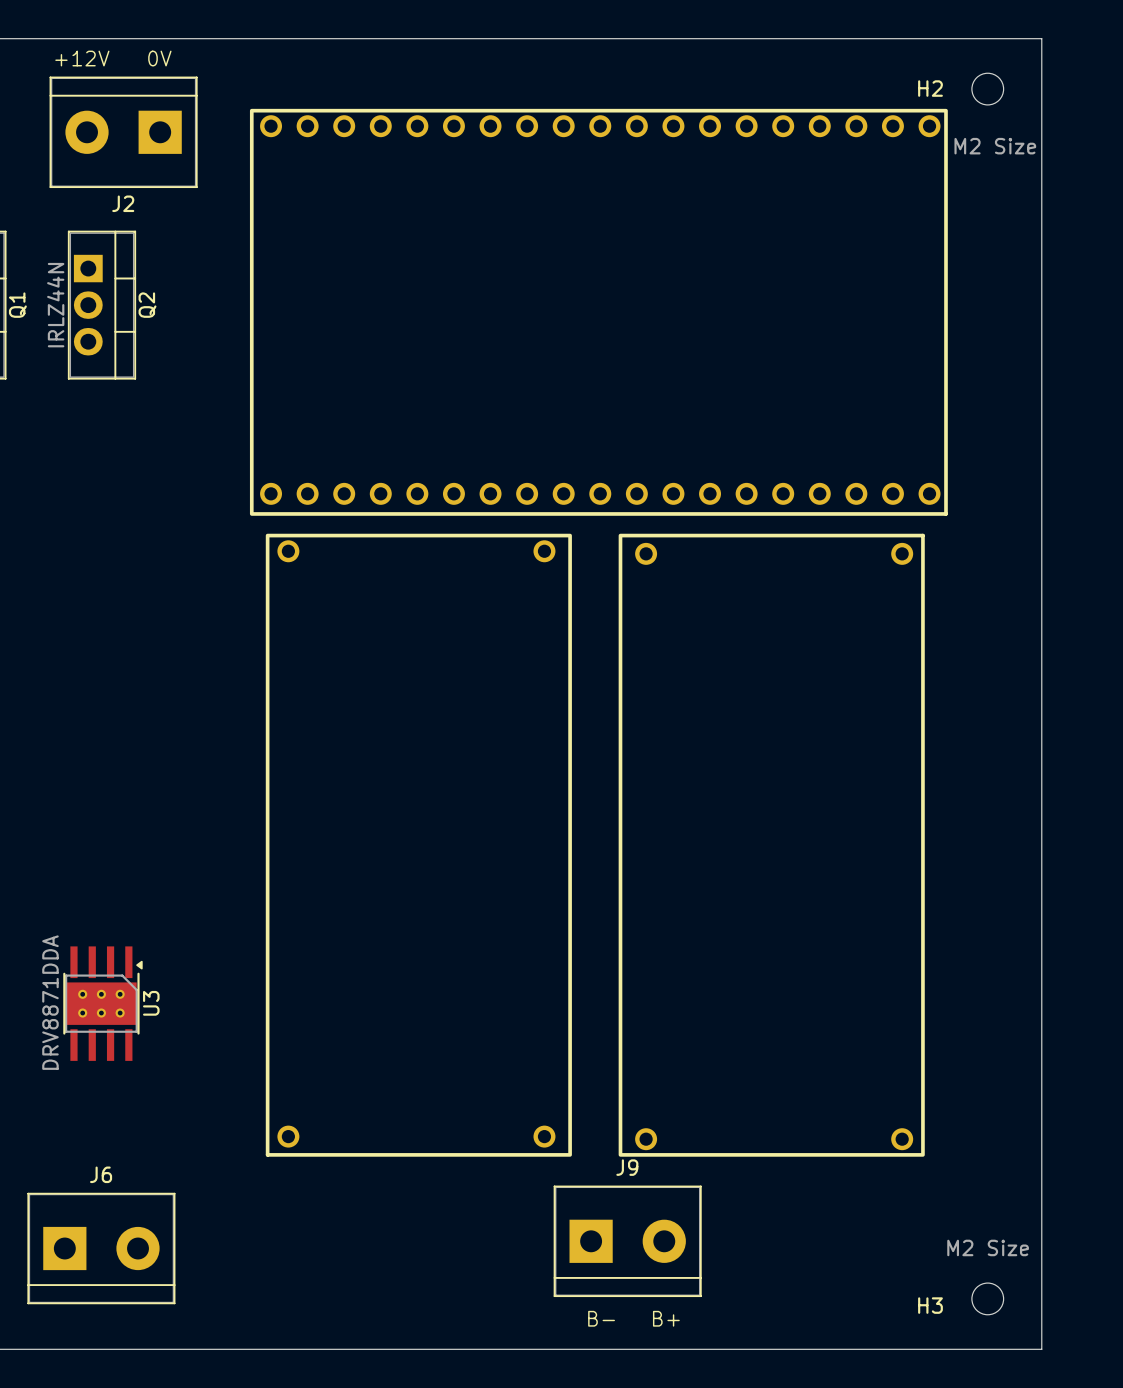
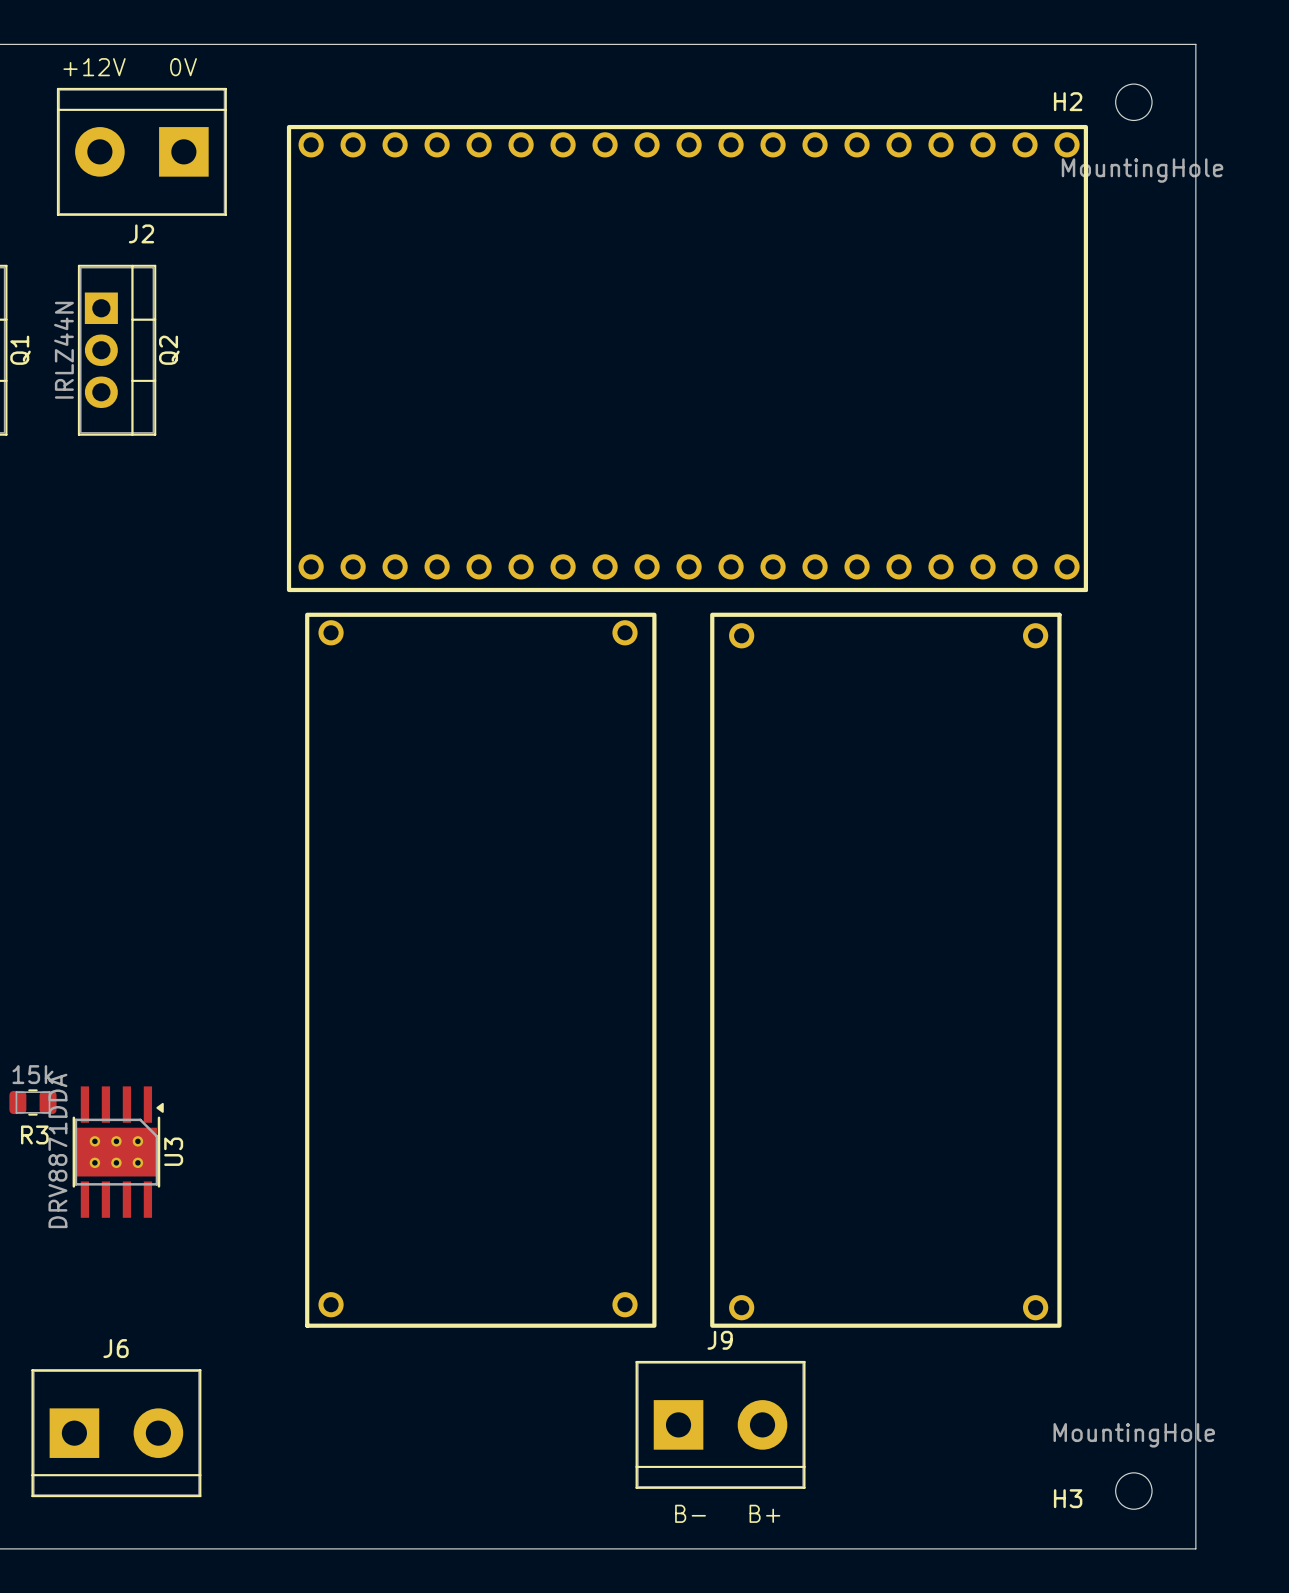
H2 value: M2 Size (995, 146) -> MountingHole (1142, 170)
R3: none -> 15k (32, 1102)
H3 value: M2 Size (988, 1247) -> MountingHole (1134, 1435)

